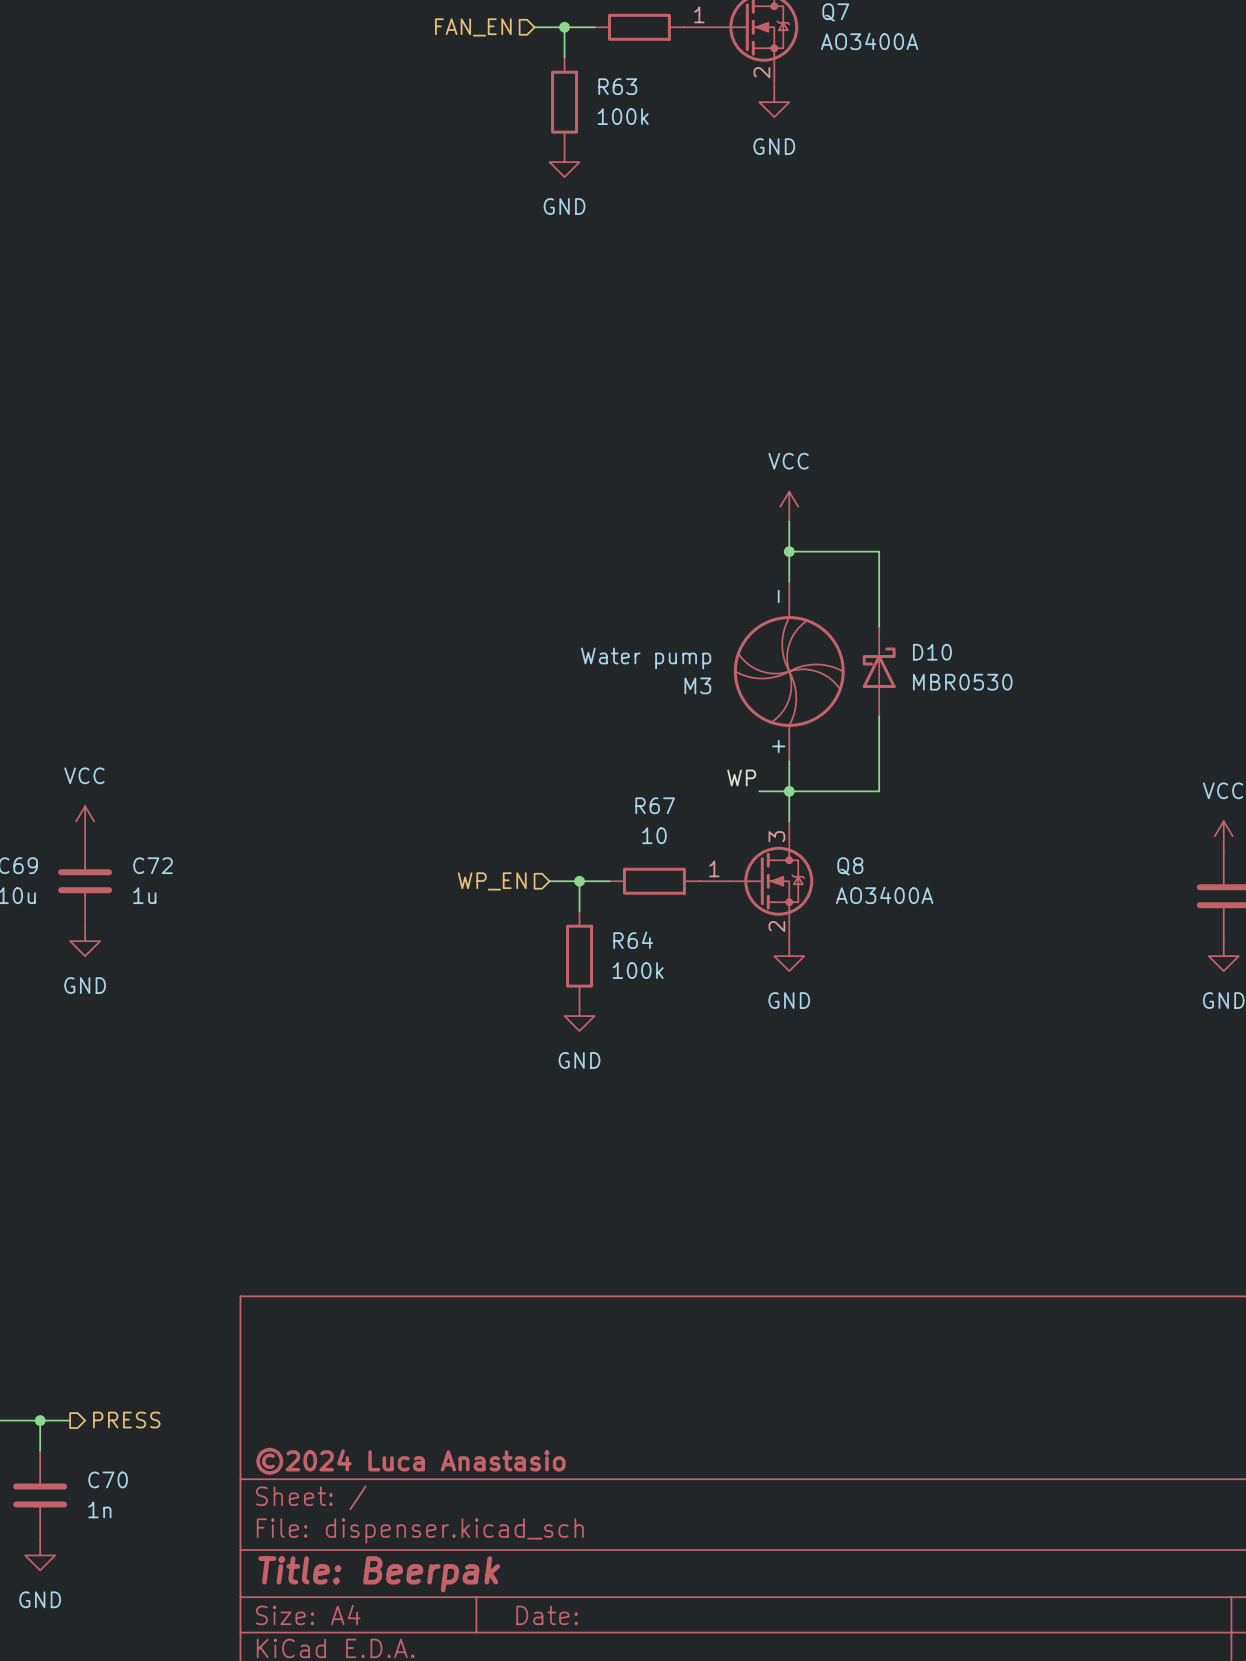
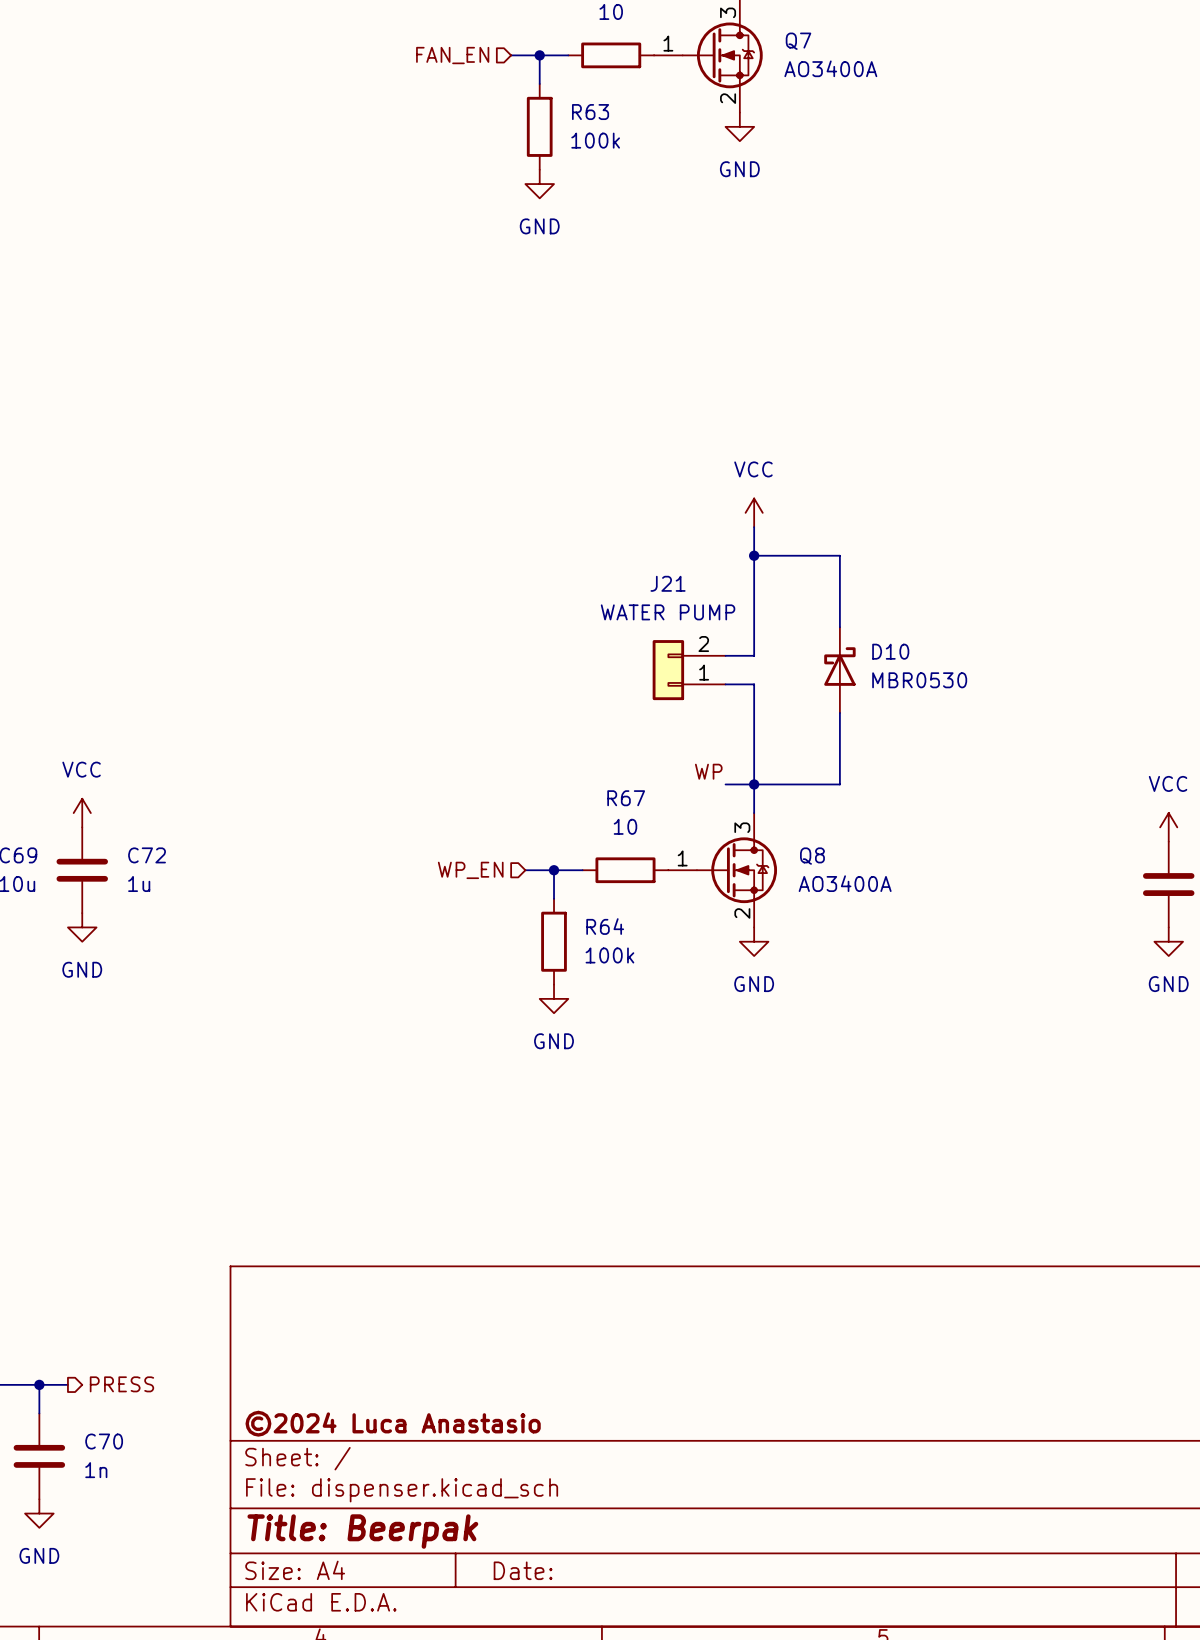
wire: none -> (754, 584) (754, 655) (725, 655)
J21: none -> WATER PUMP (689, 670)
M3: Water pump (789, 671) -> none
wire: none -> (725, 684) (754, 684) (754, 755)

